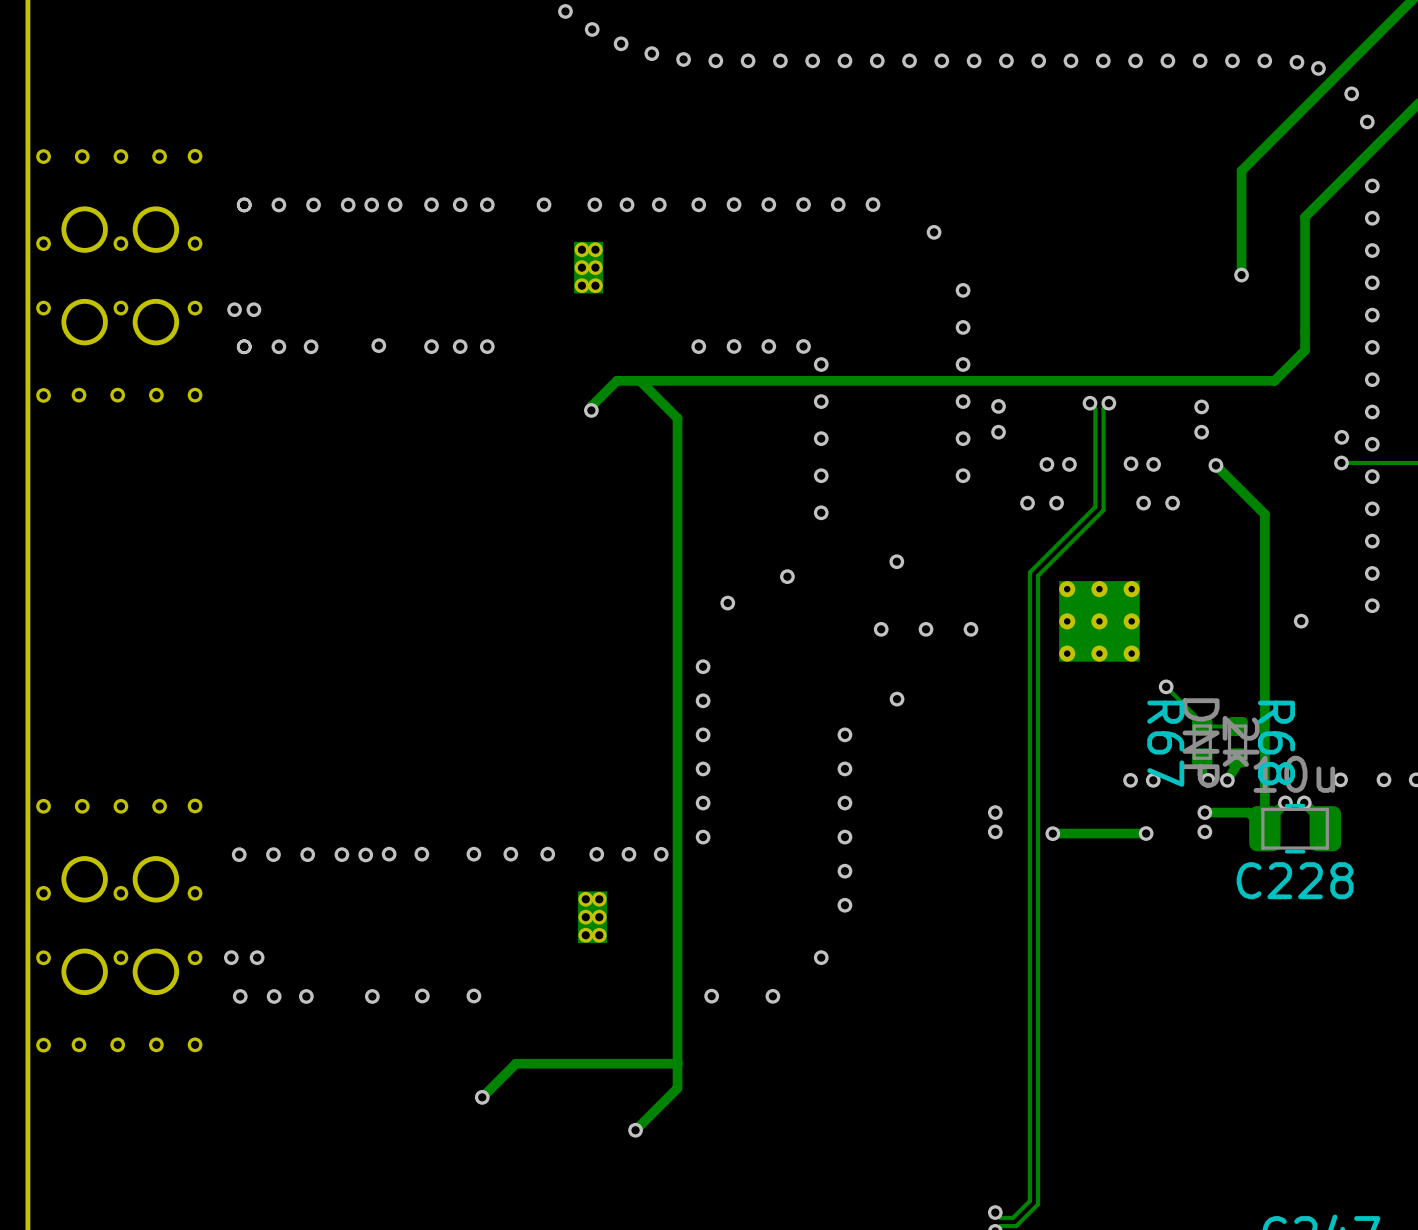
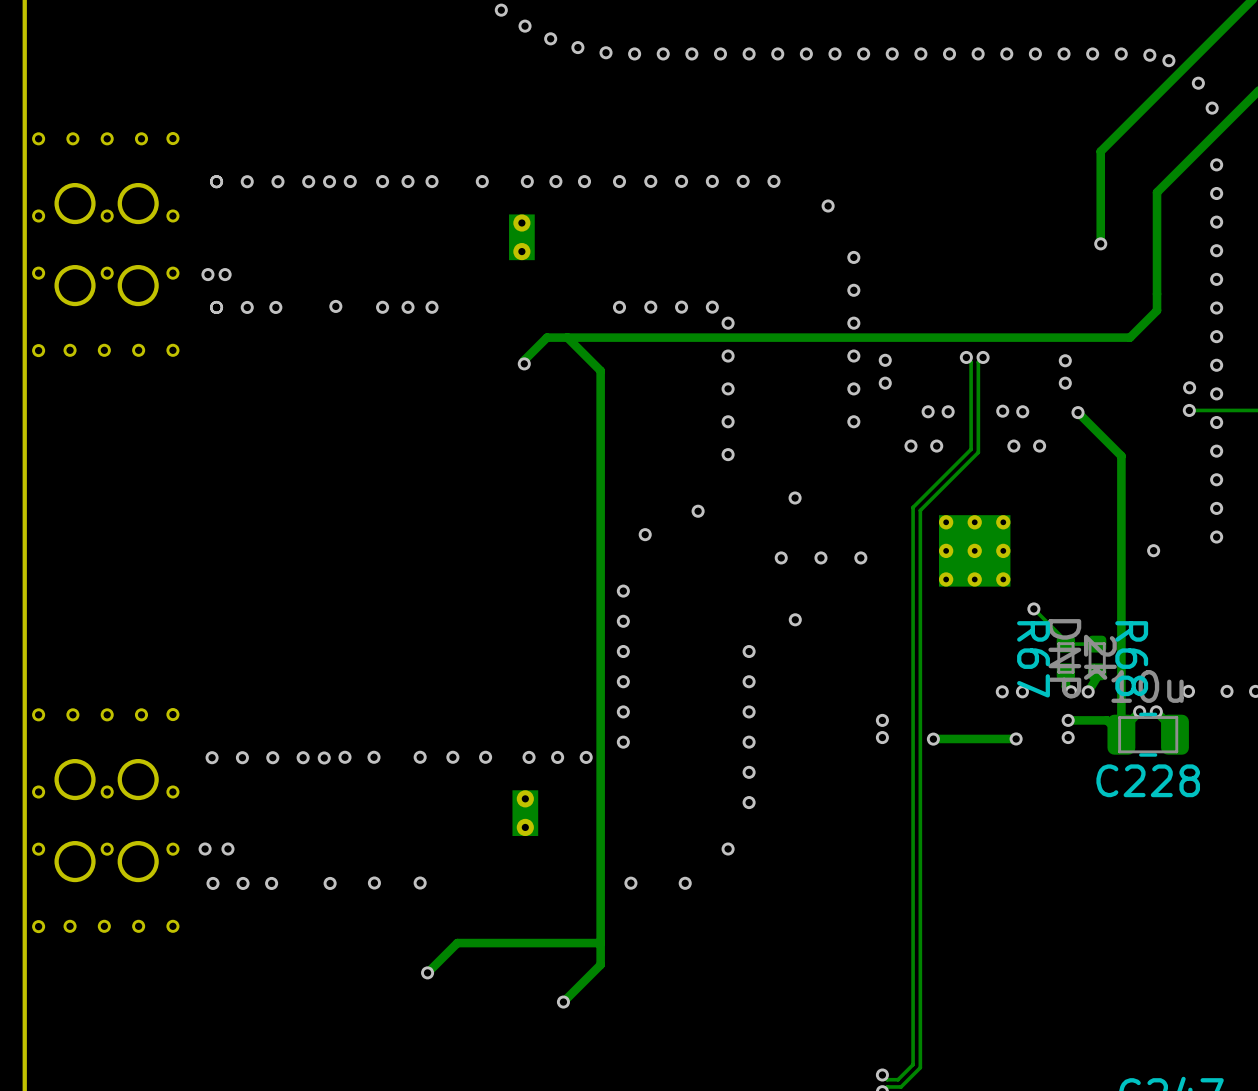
part footprint: [574, 241, 604, 294] -> [509, 214, 535, 261]
part footprint: [578, 891, 608, 943] -> [512, 790, 539, 837]

